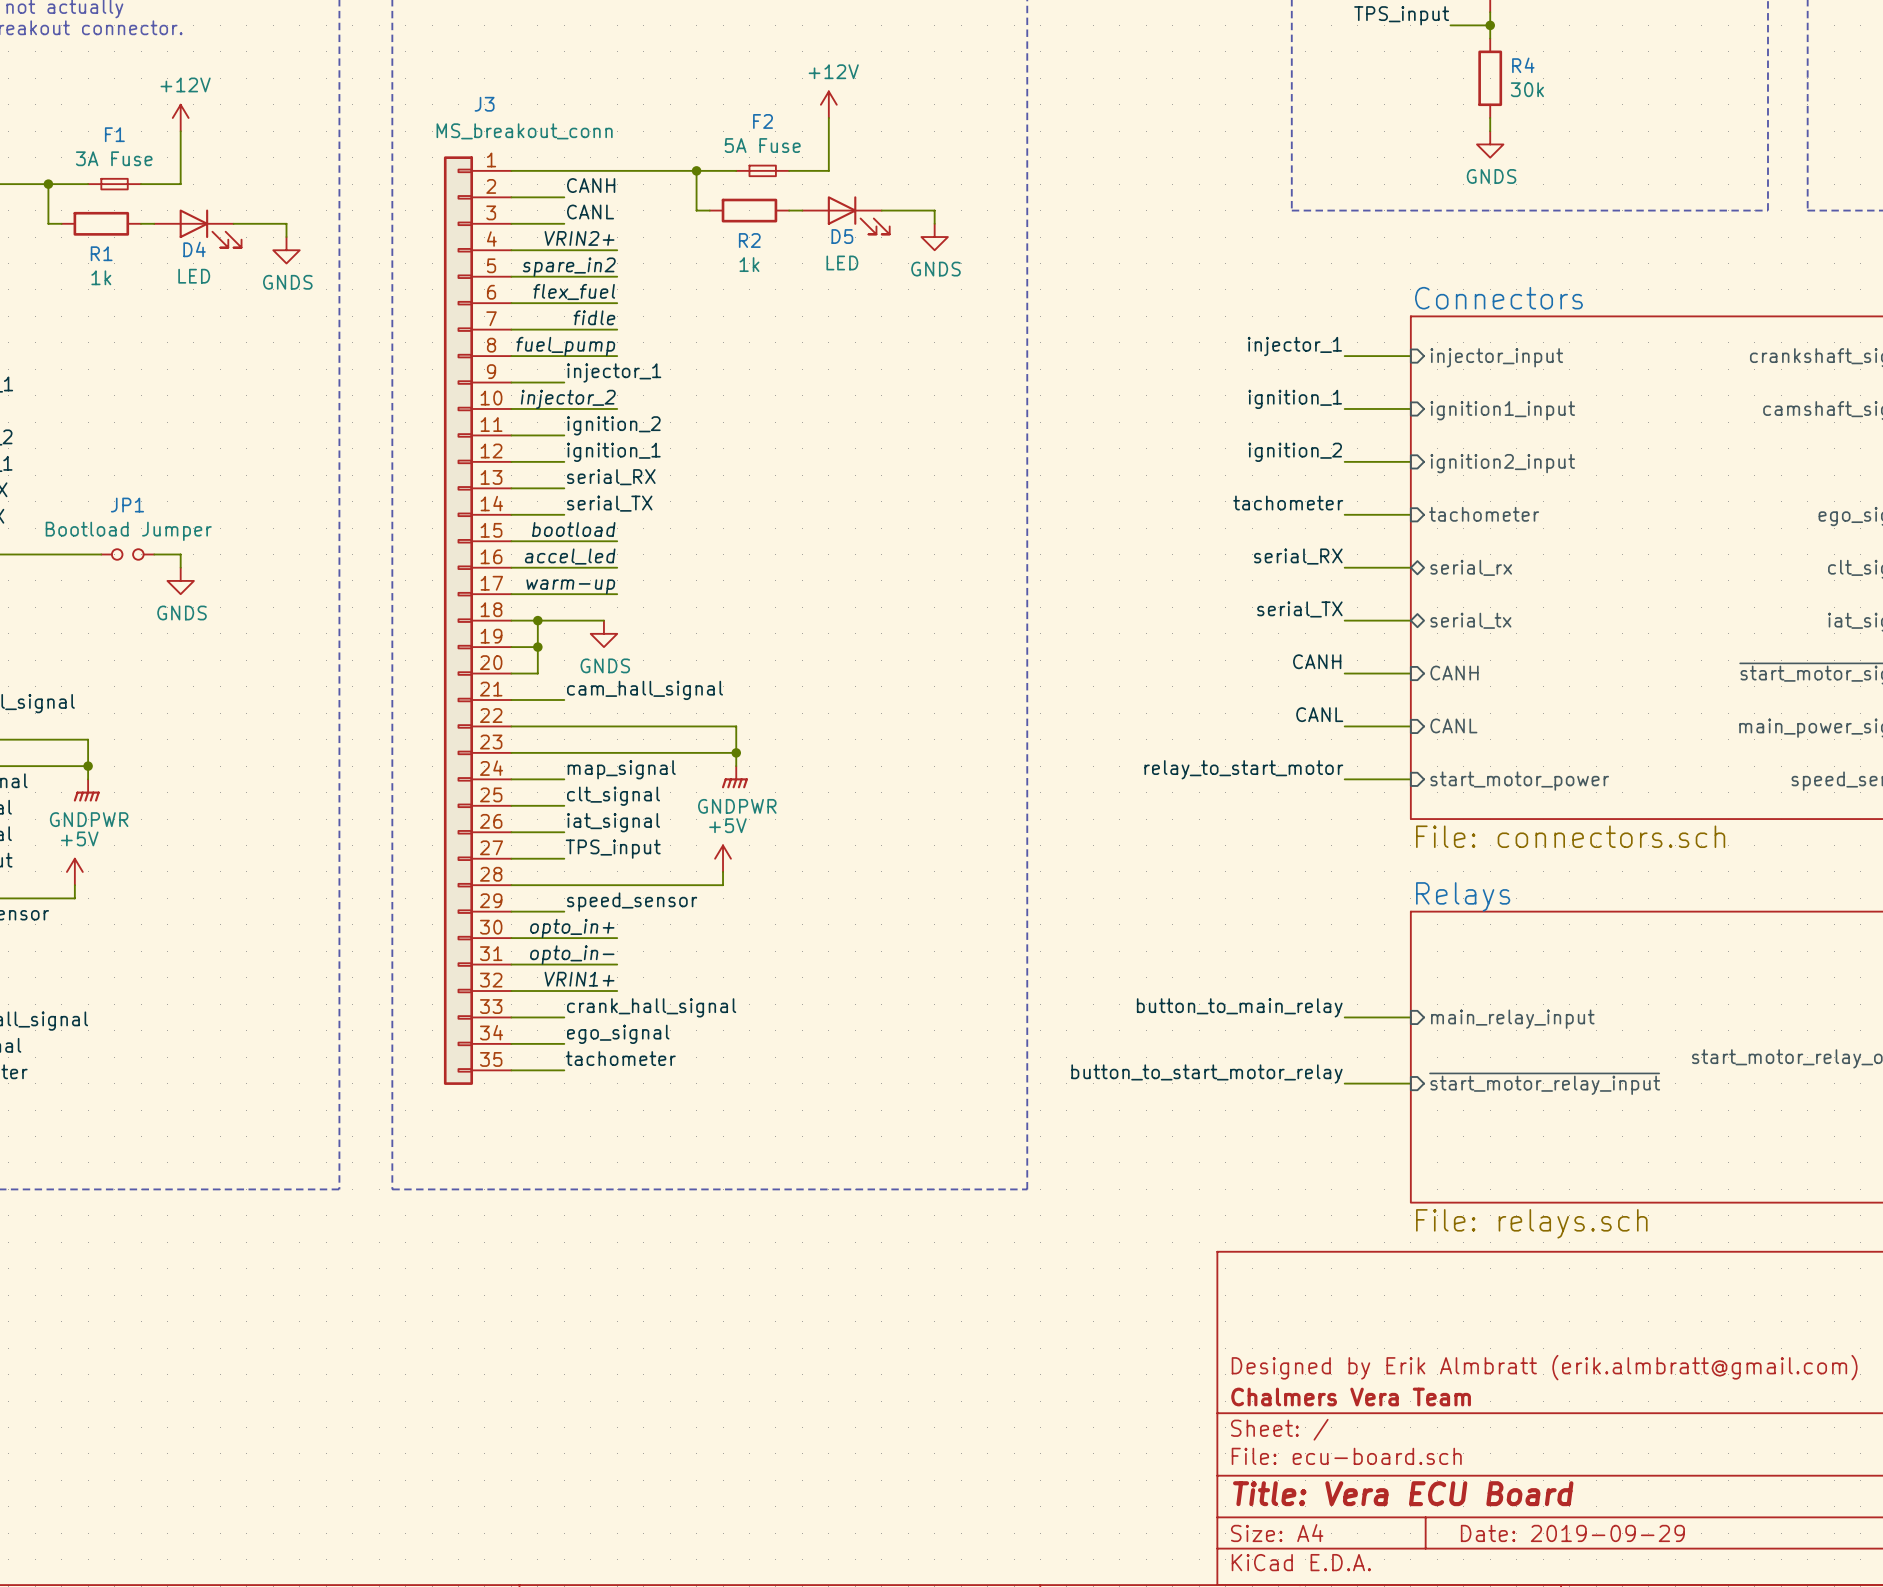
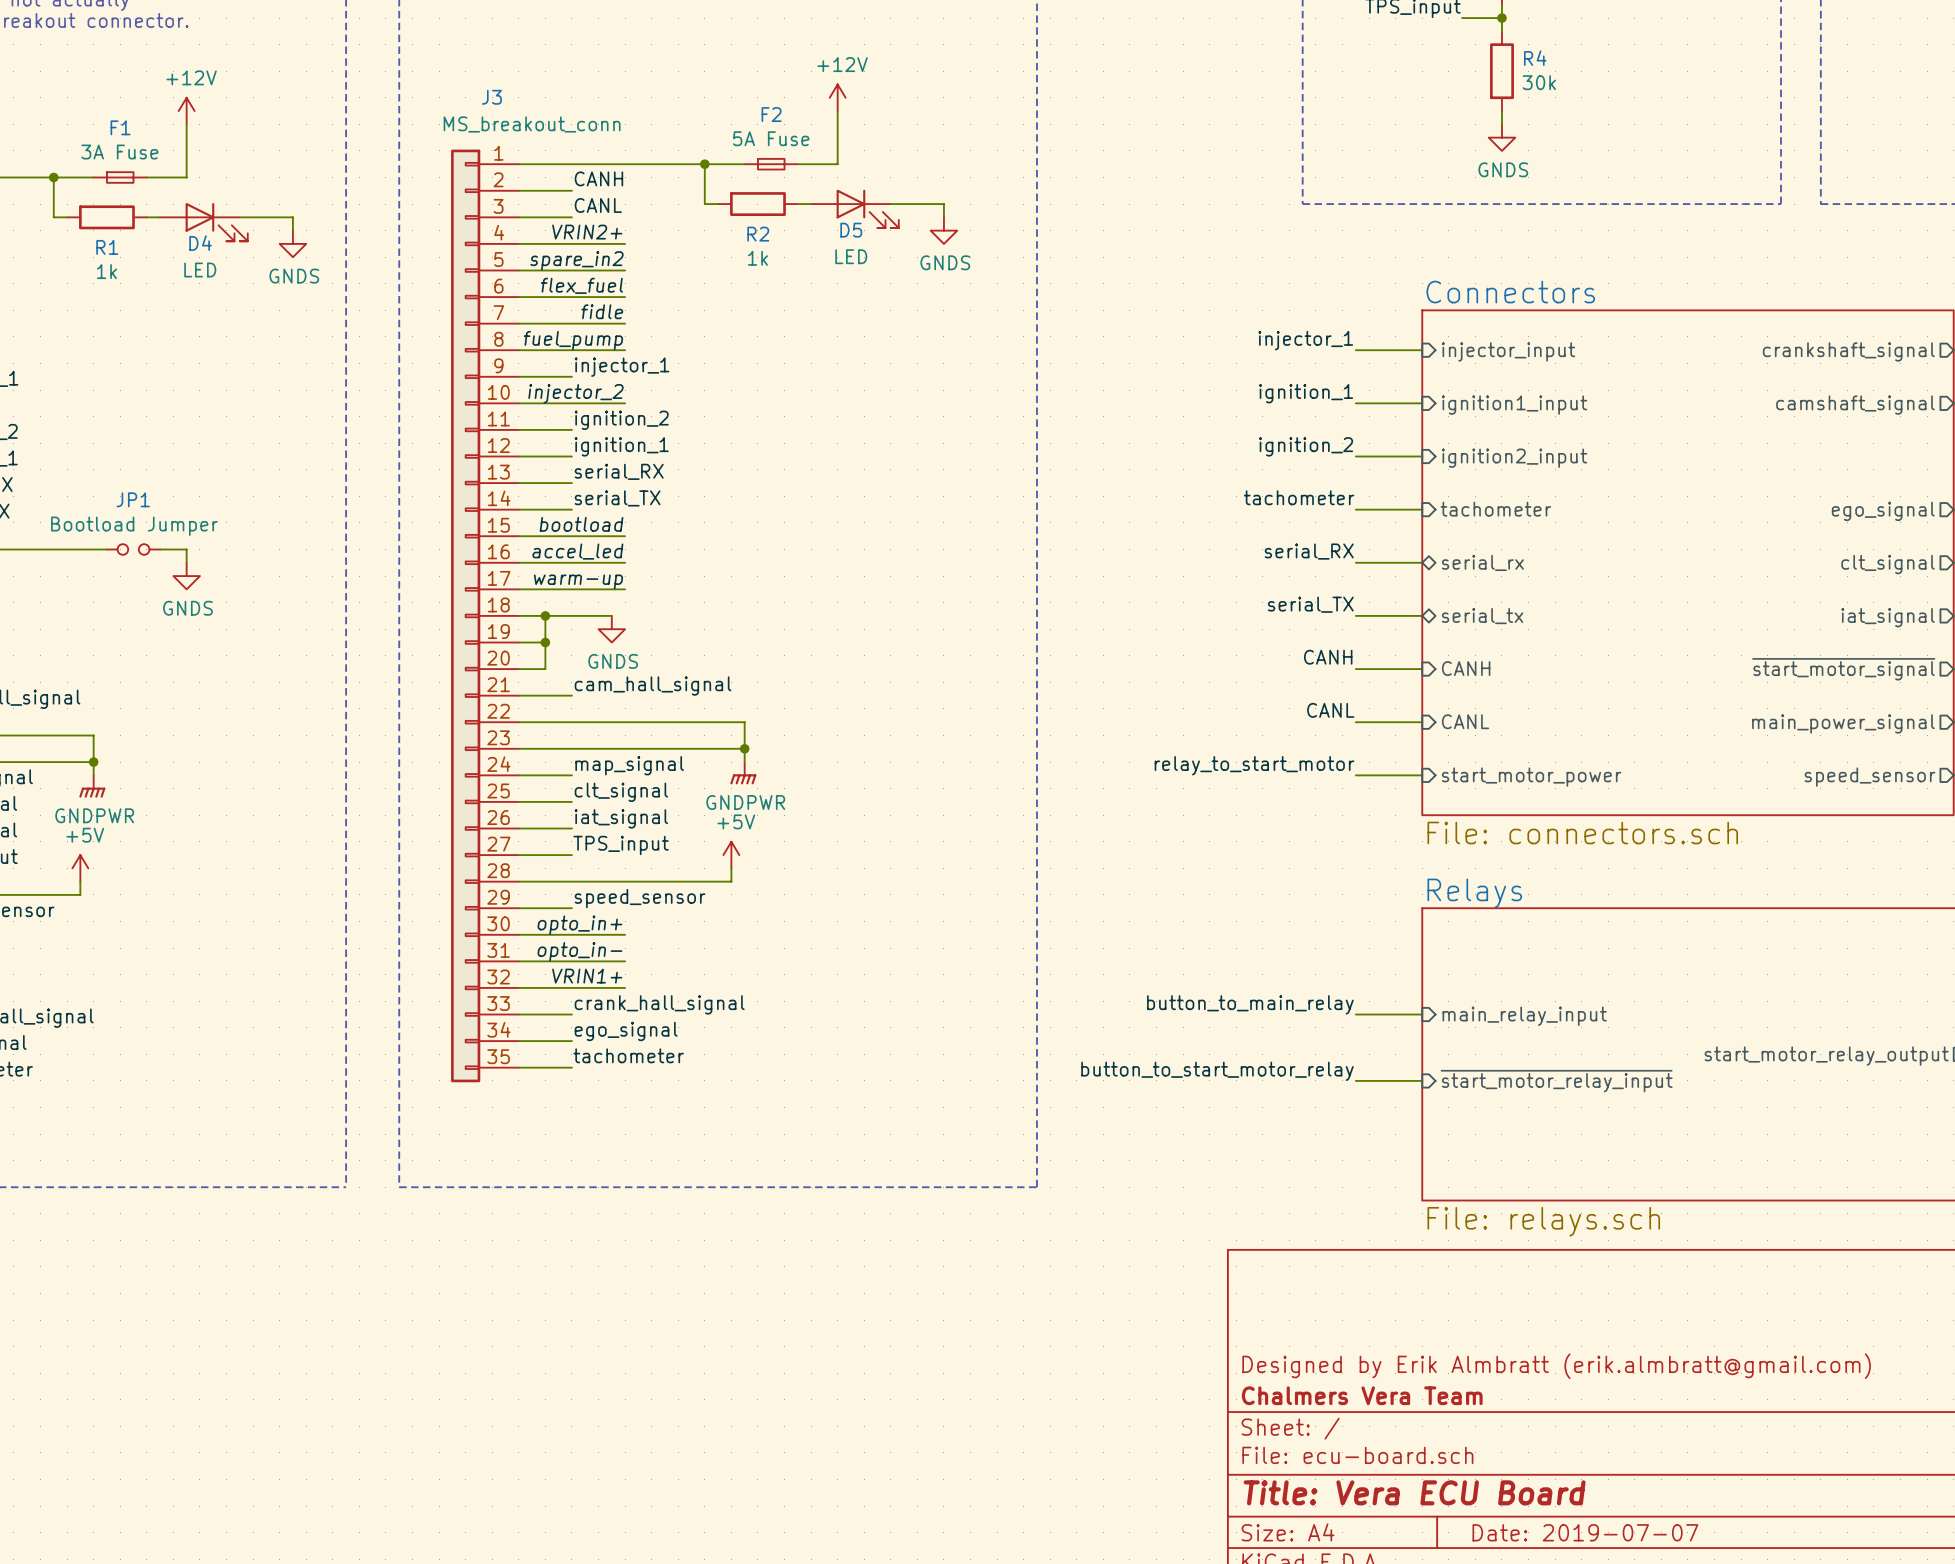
title block: Date: 2019-09-29 (1572, 1533) -> Date: 2019-07-07 (1585, 1532)

